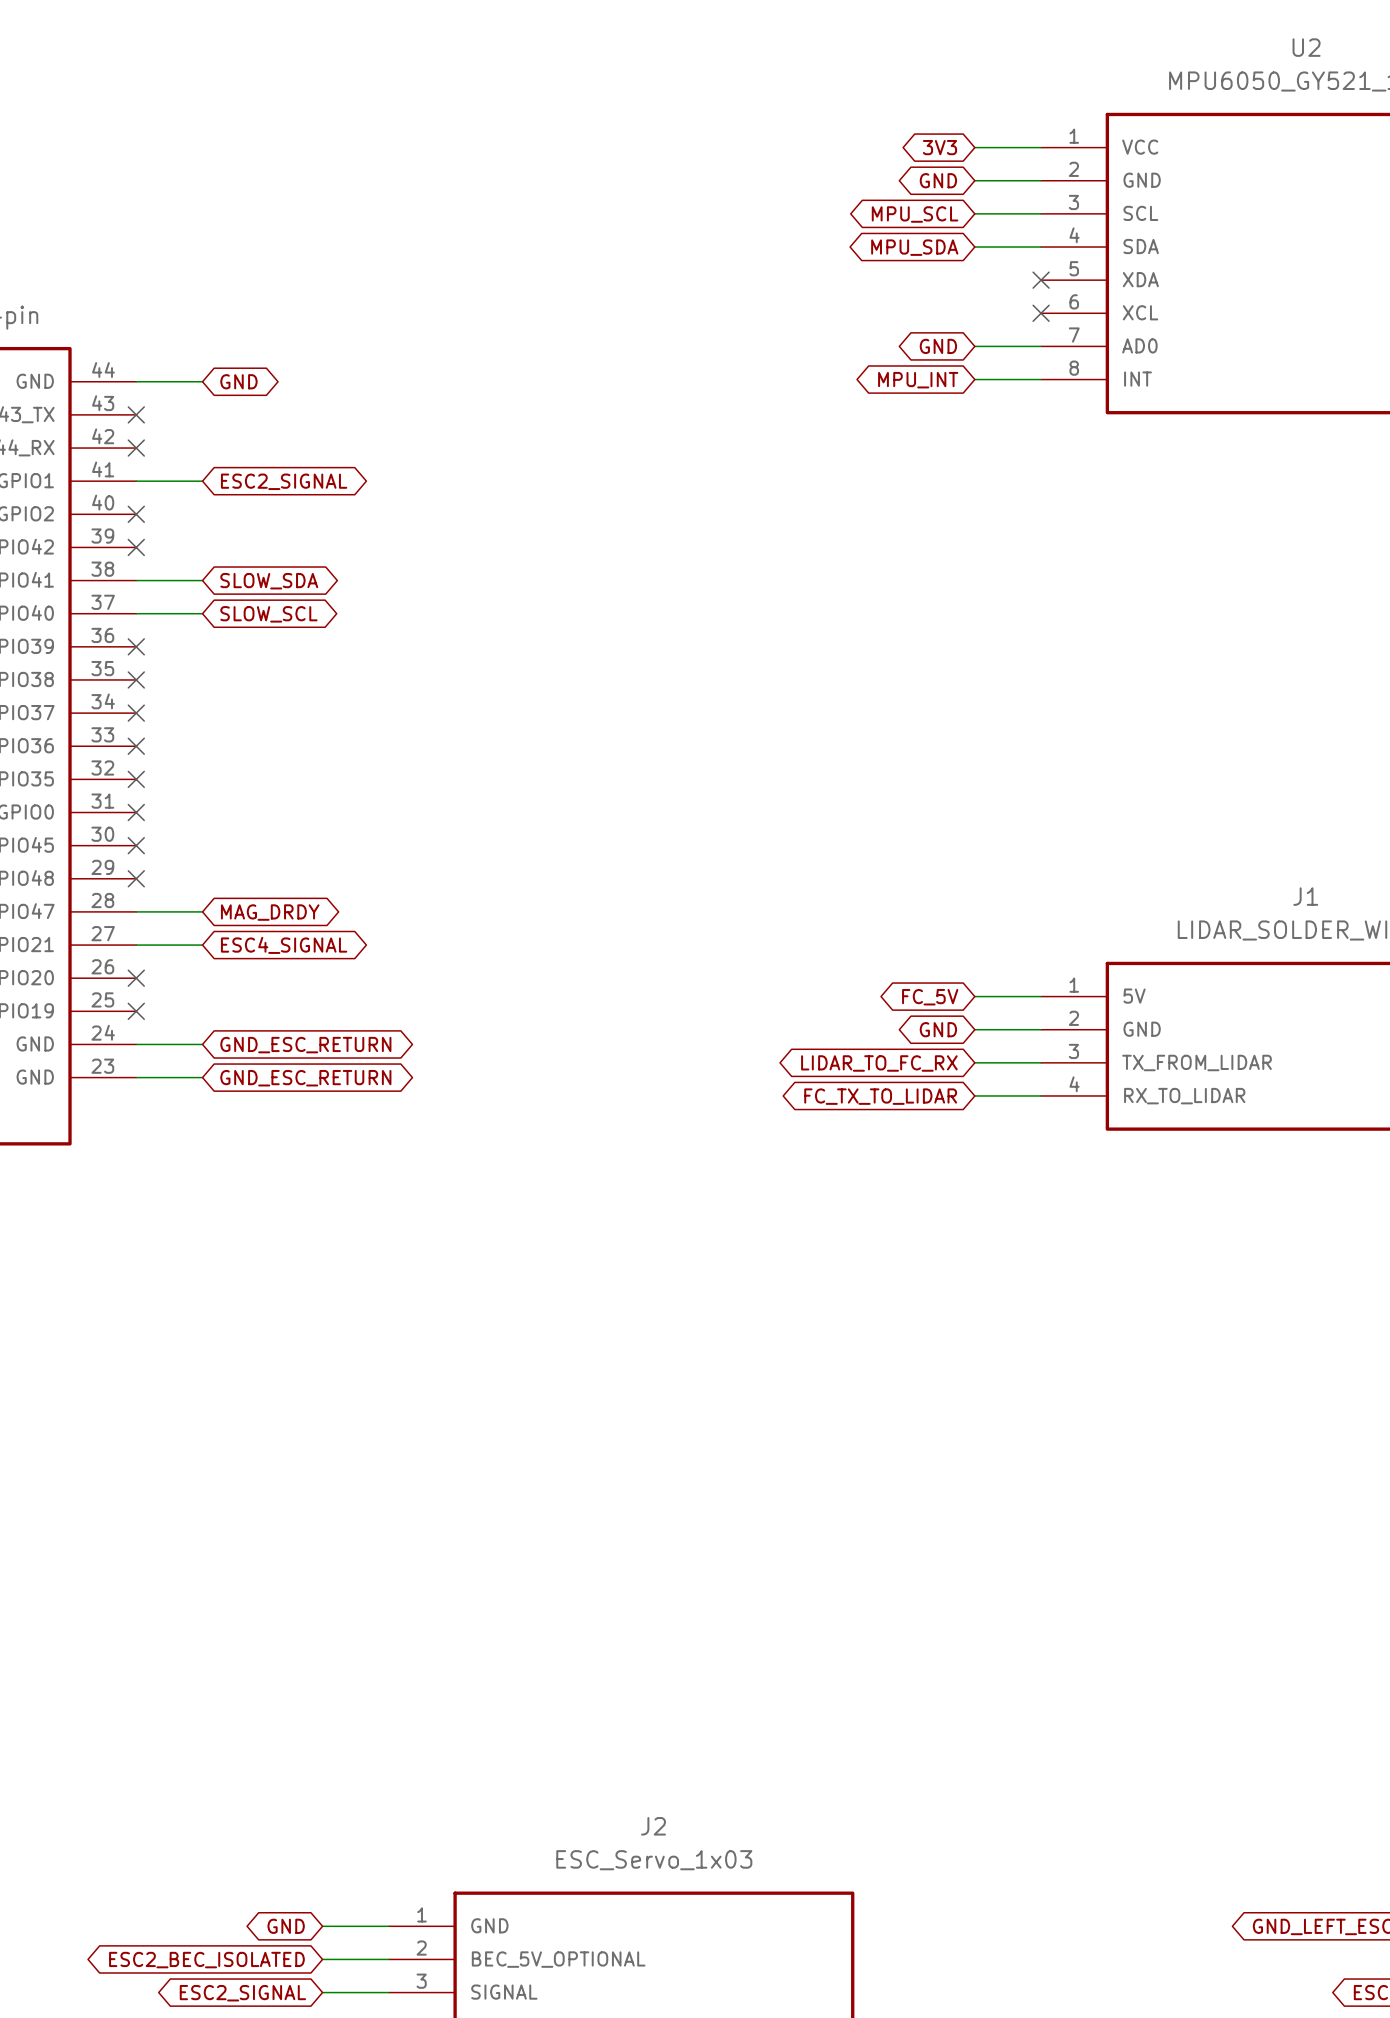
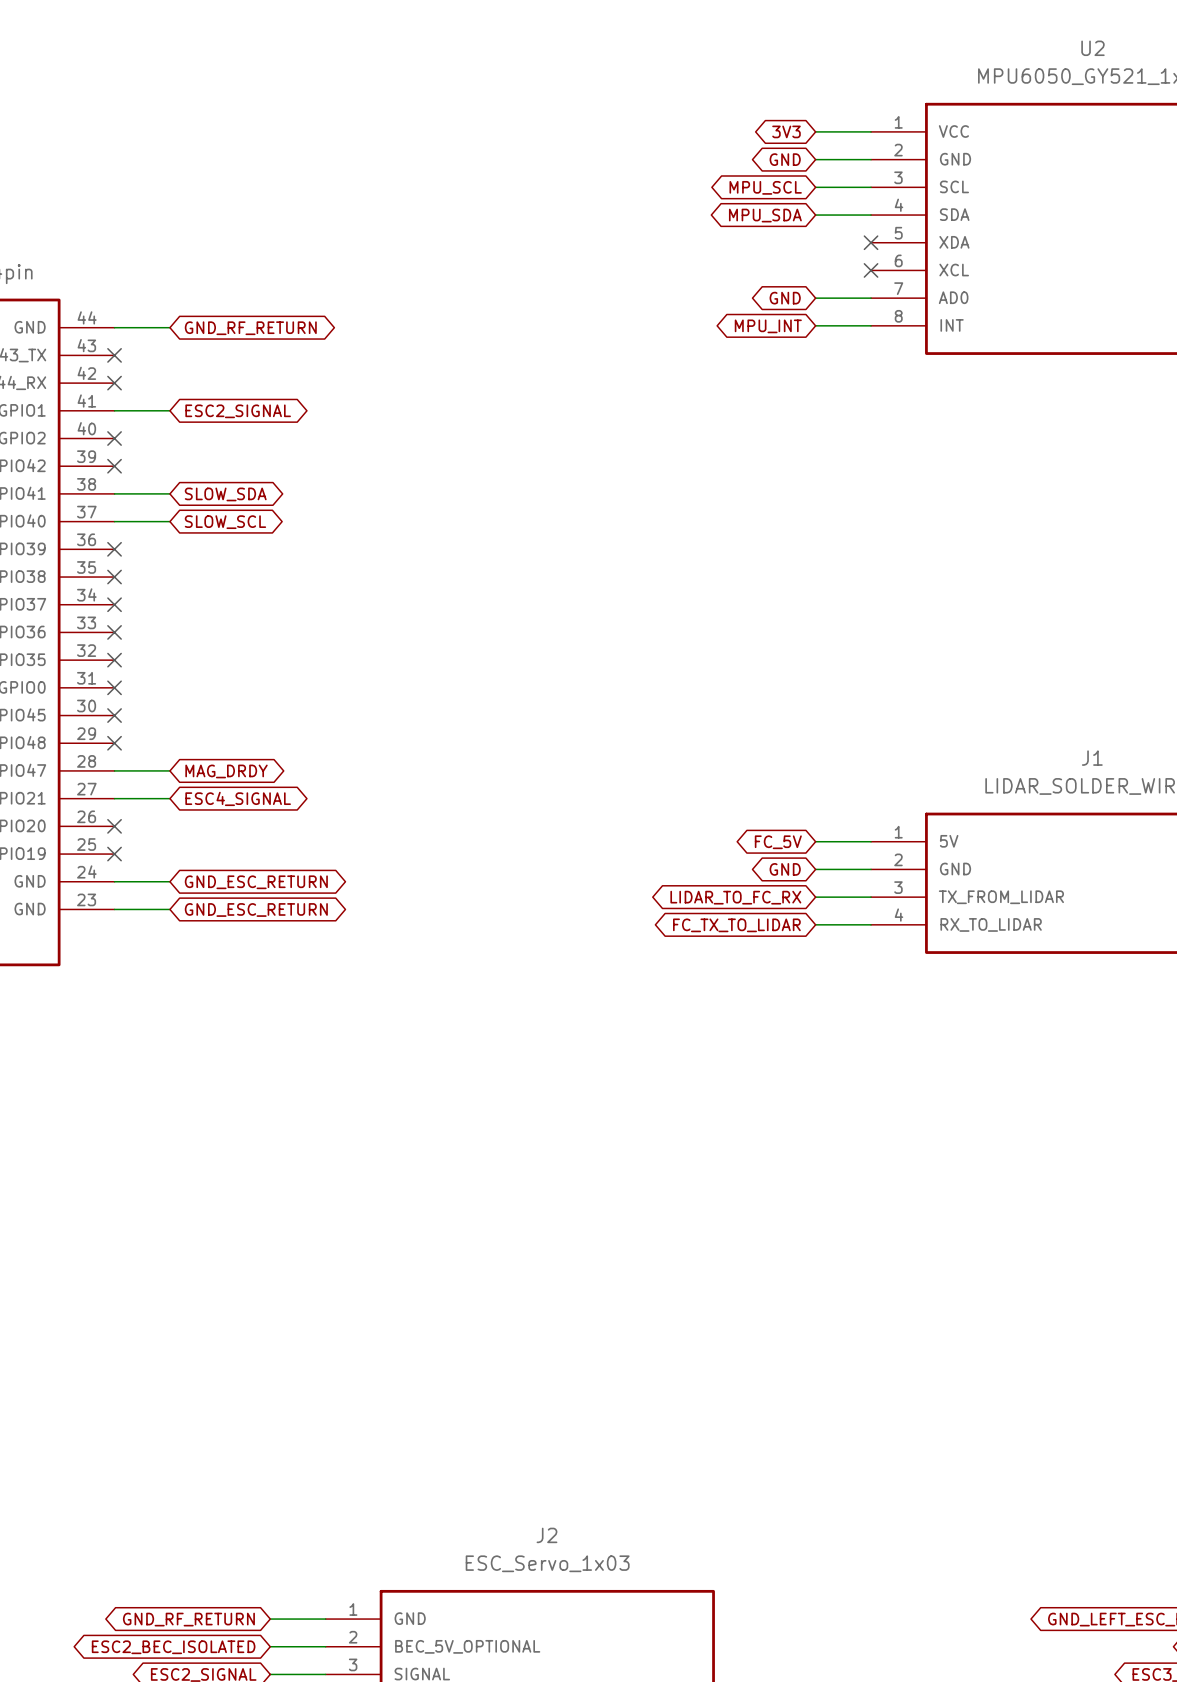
global label: GND (238, 381) -> GND_RF_RETURN (250, 328)
global label: GND (286, 1926) -> GND_RF_RETURN (188, 1619)

